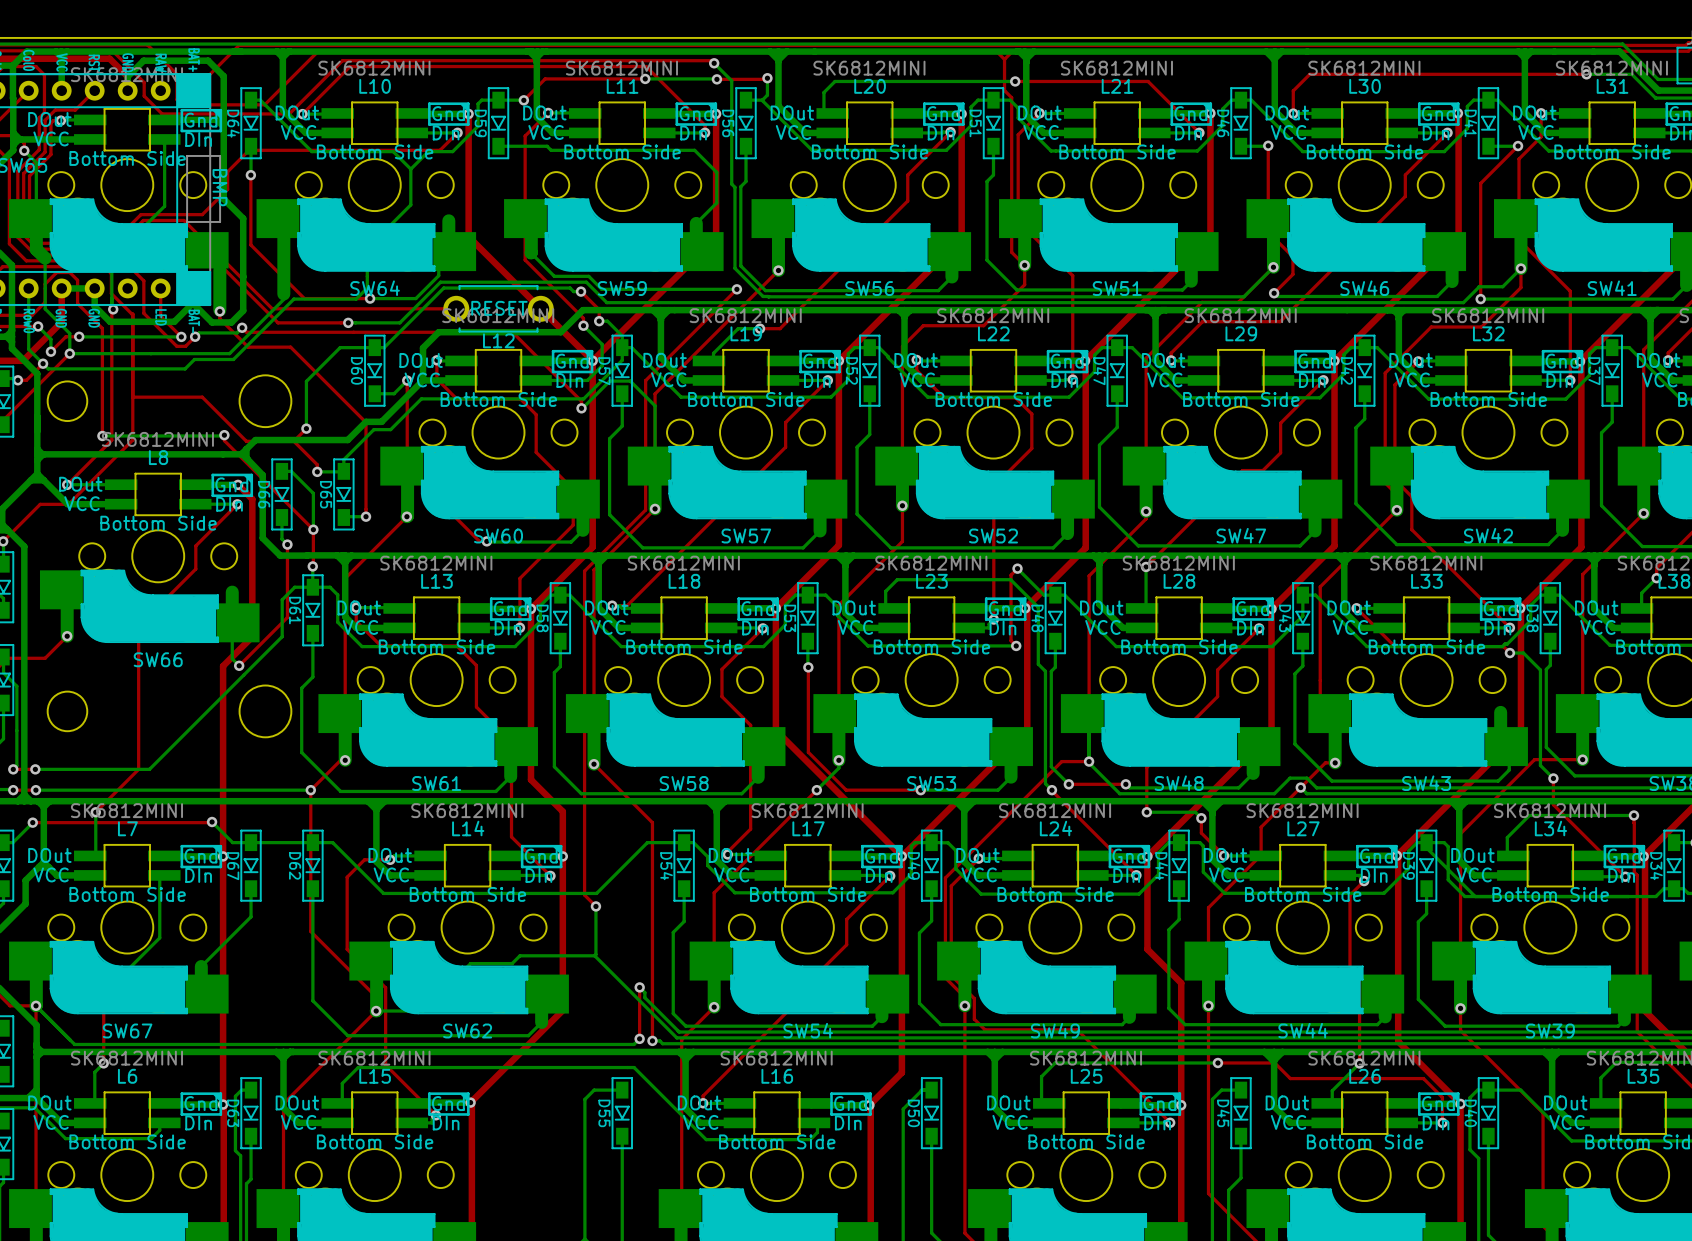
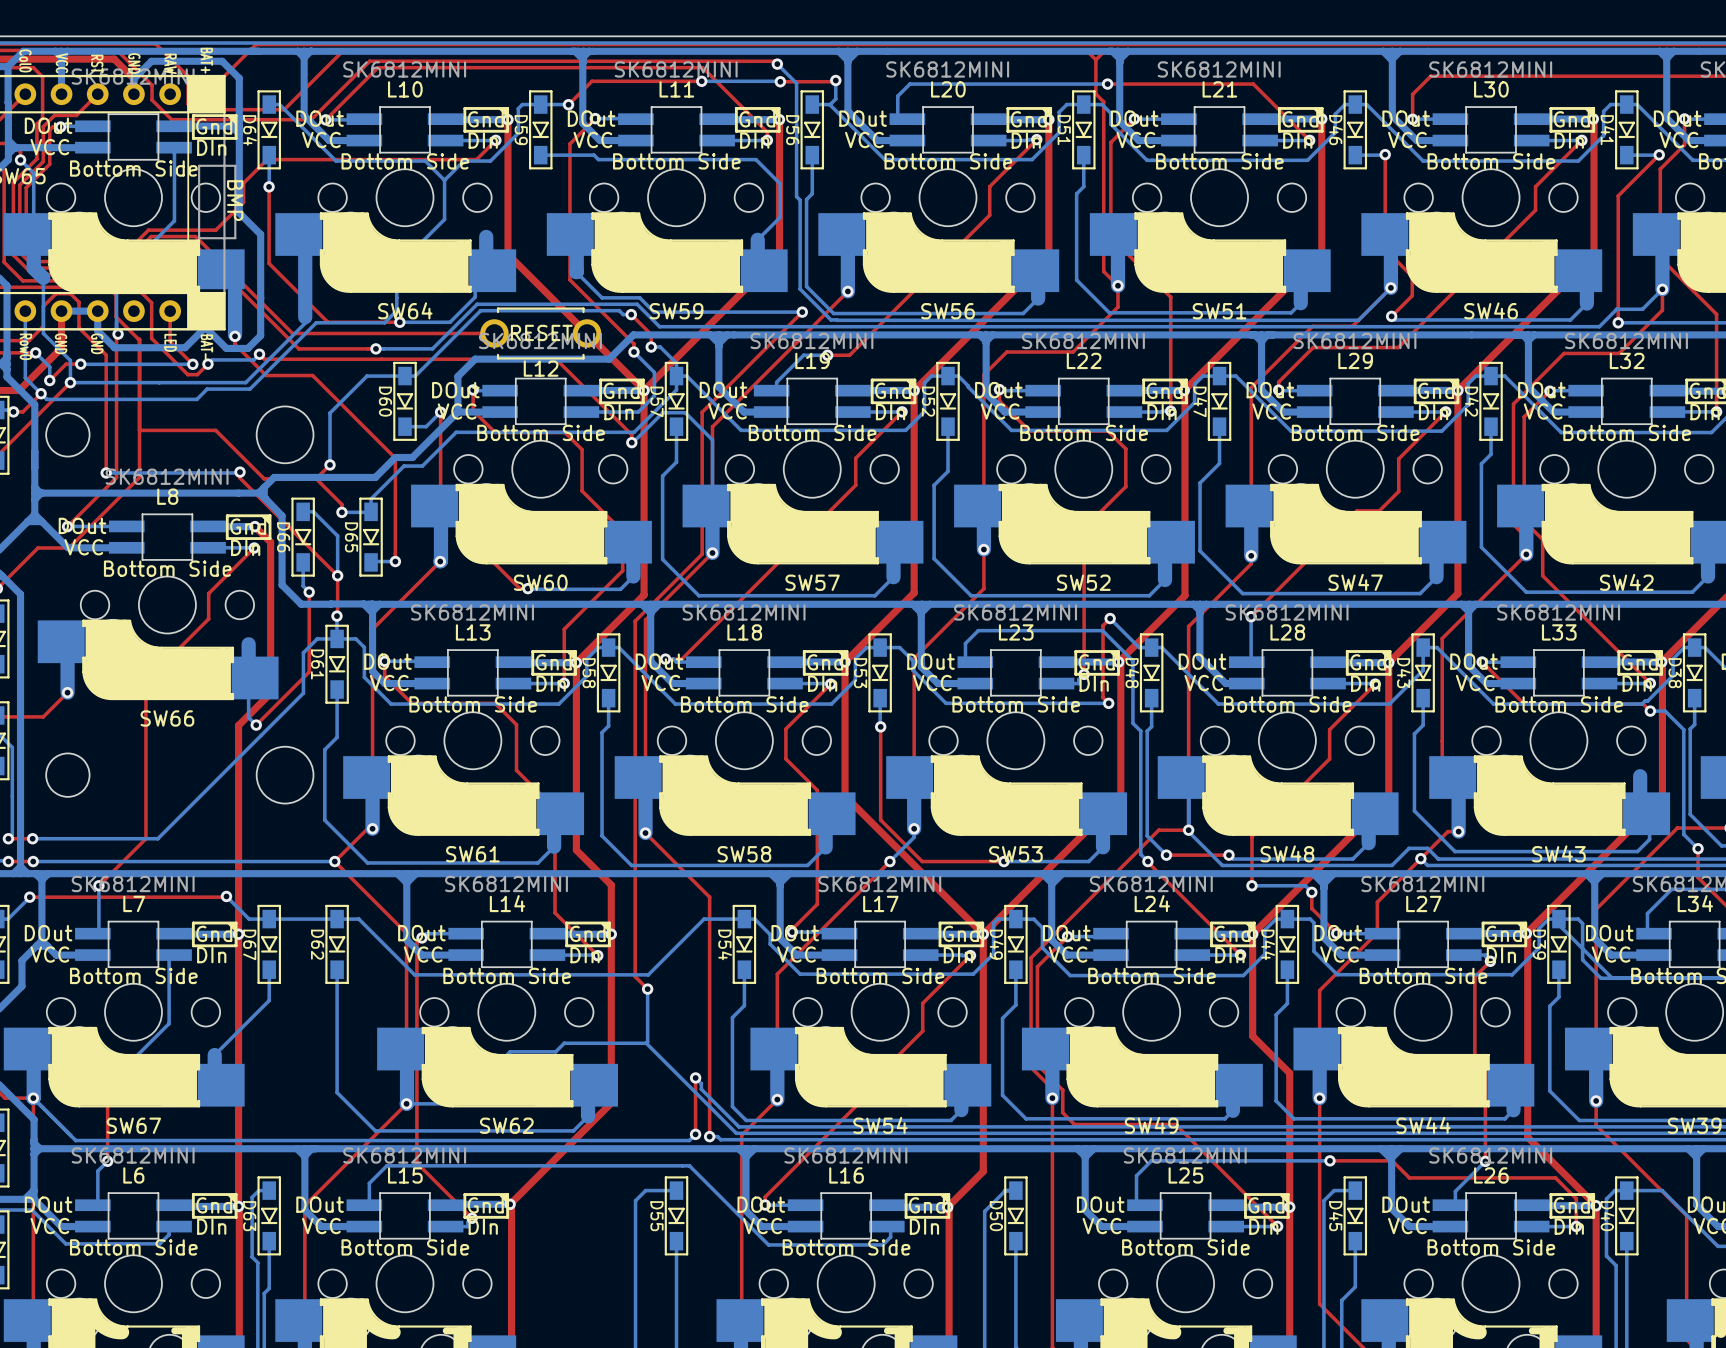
top track: (310, 790) (310, 931) (376, 996) -> (334, 861) (406, 933) (406, 1088)
top track: (390, 859) (364, 859) (347, 877) (347, 949) (385, 987) -> (422, 937) (416, 943) (416, 1078)

